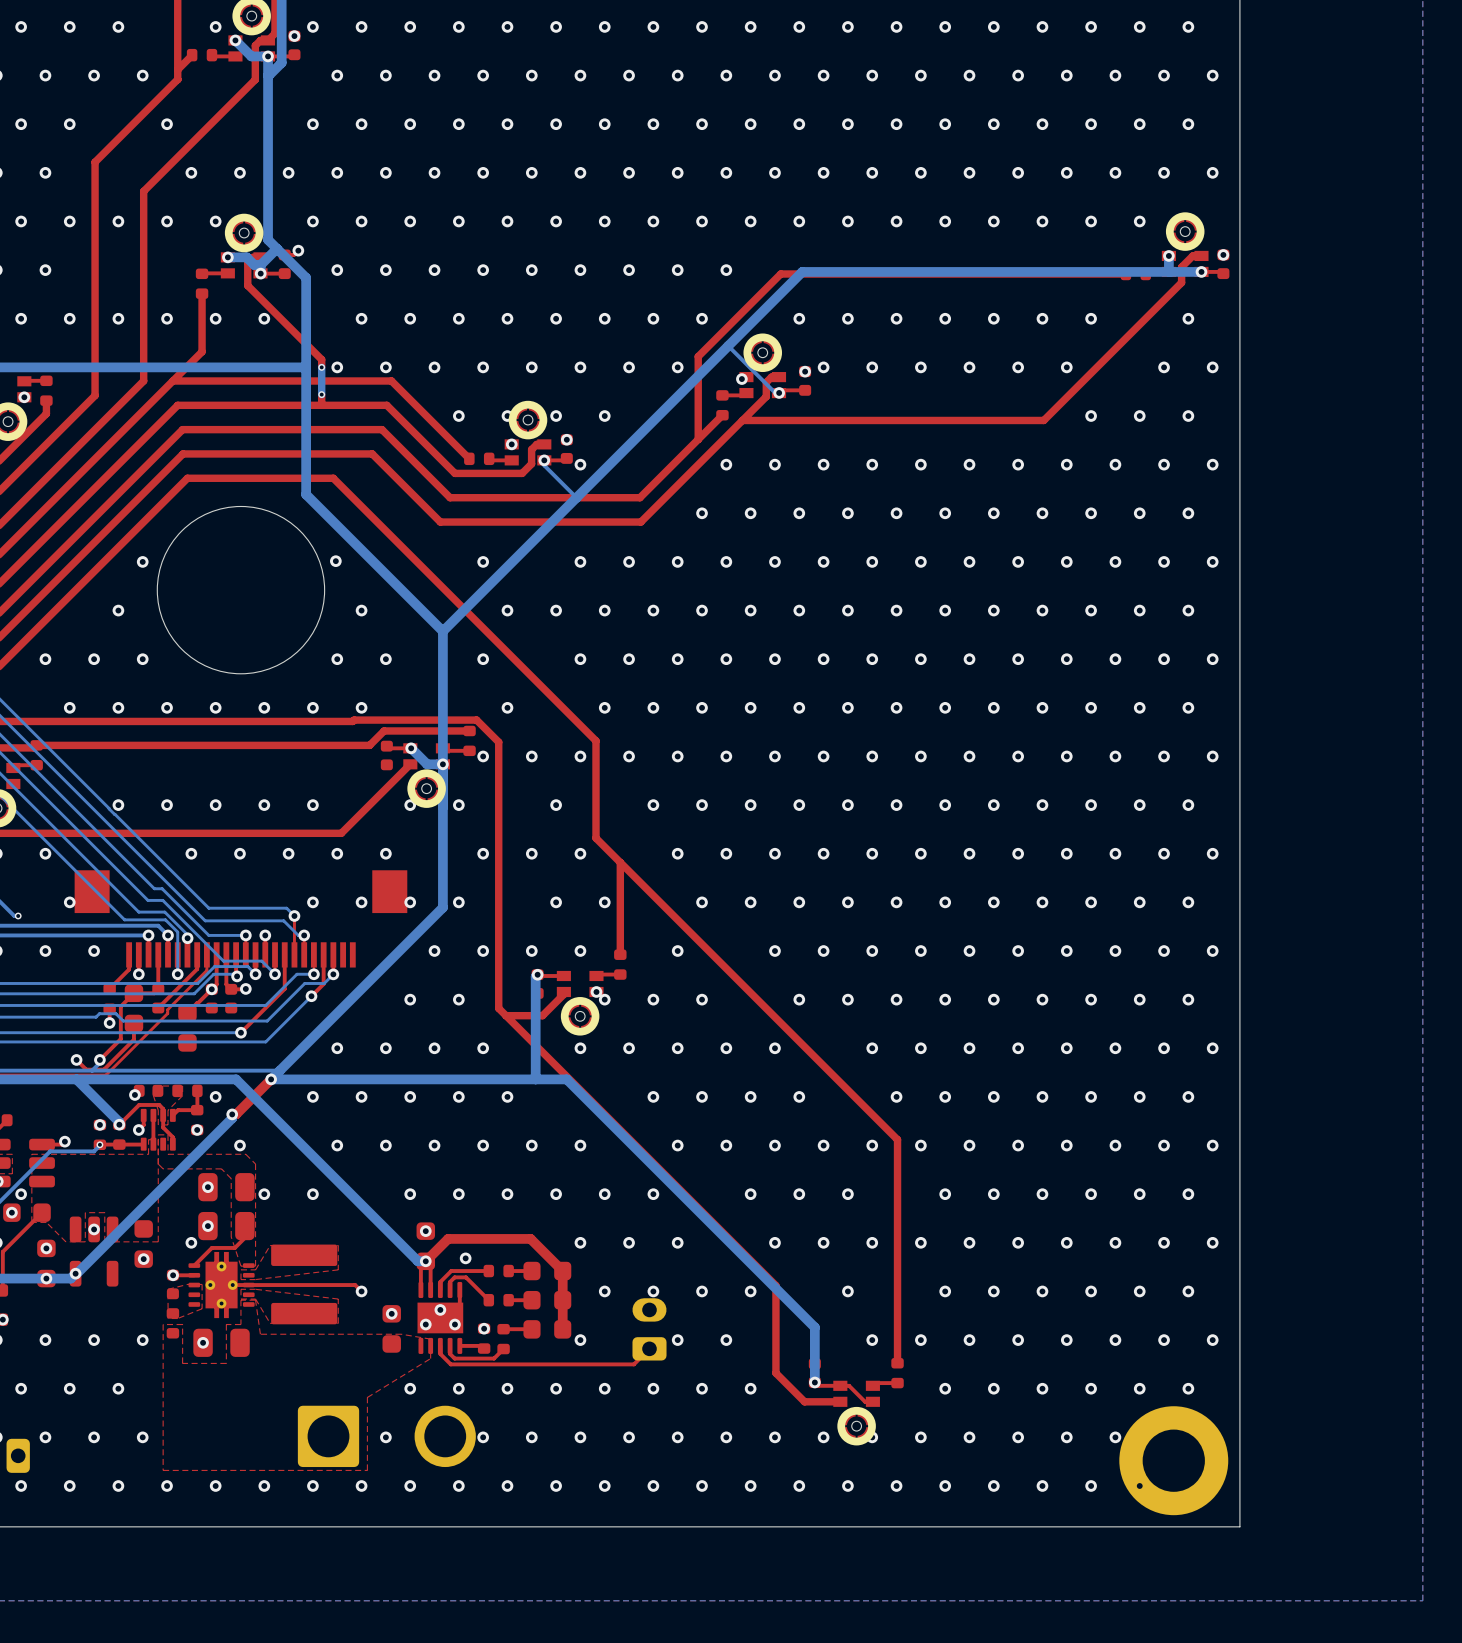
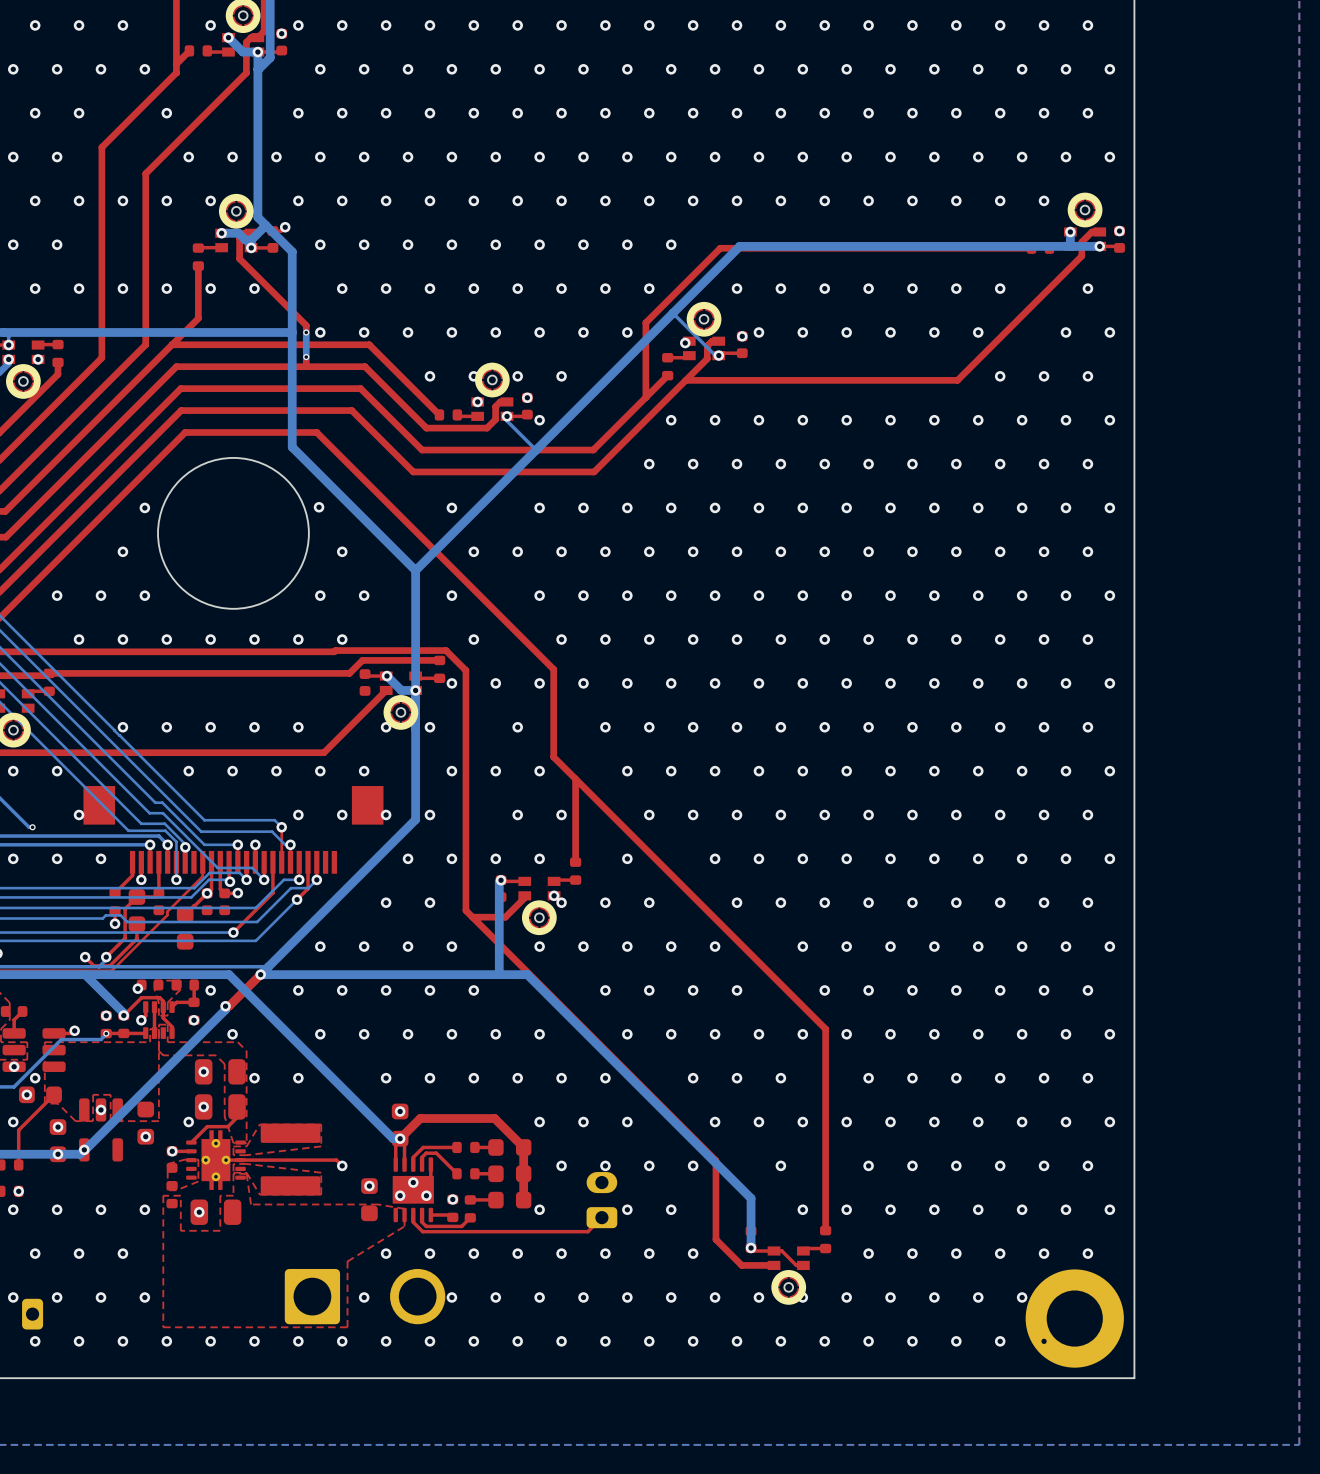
top track: (197, 954) (197, 969) (158, 1008) -> none
via: (465, 1258) -> none

